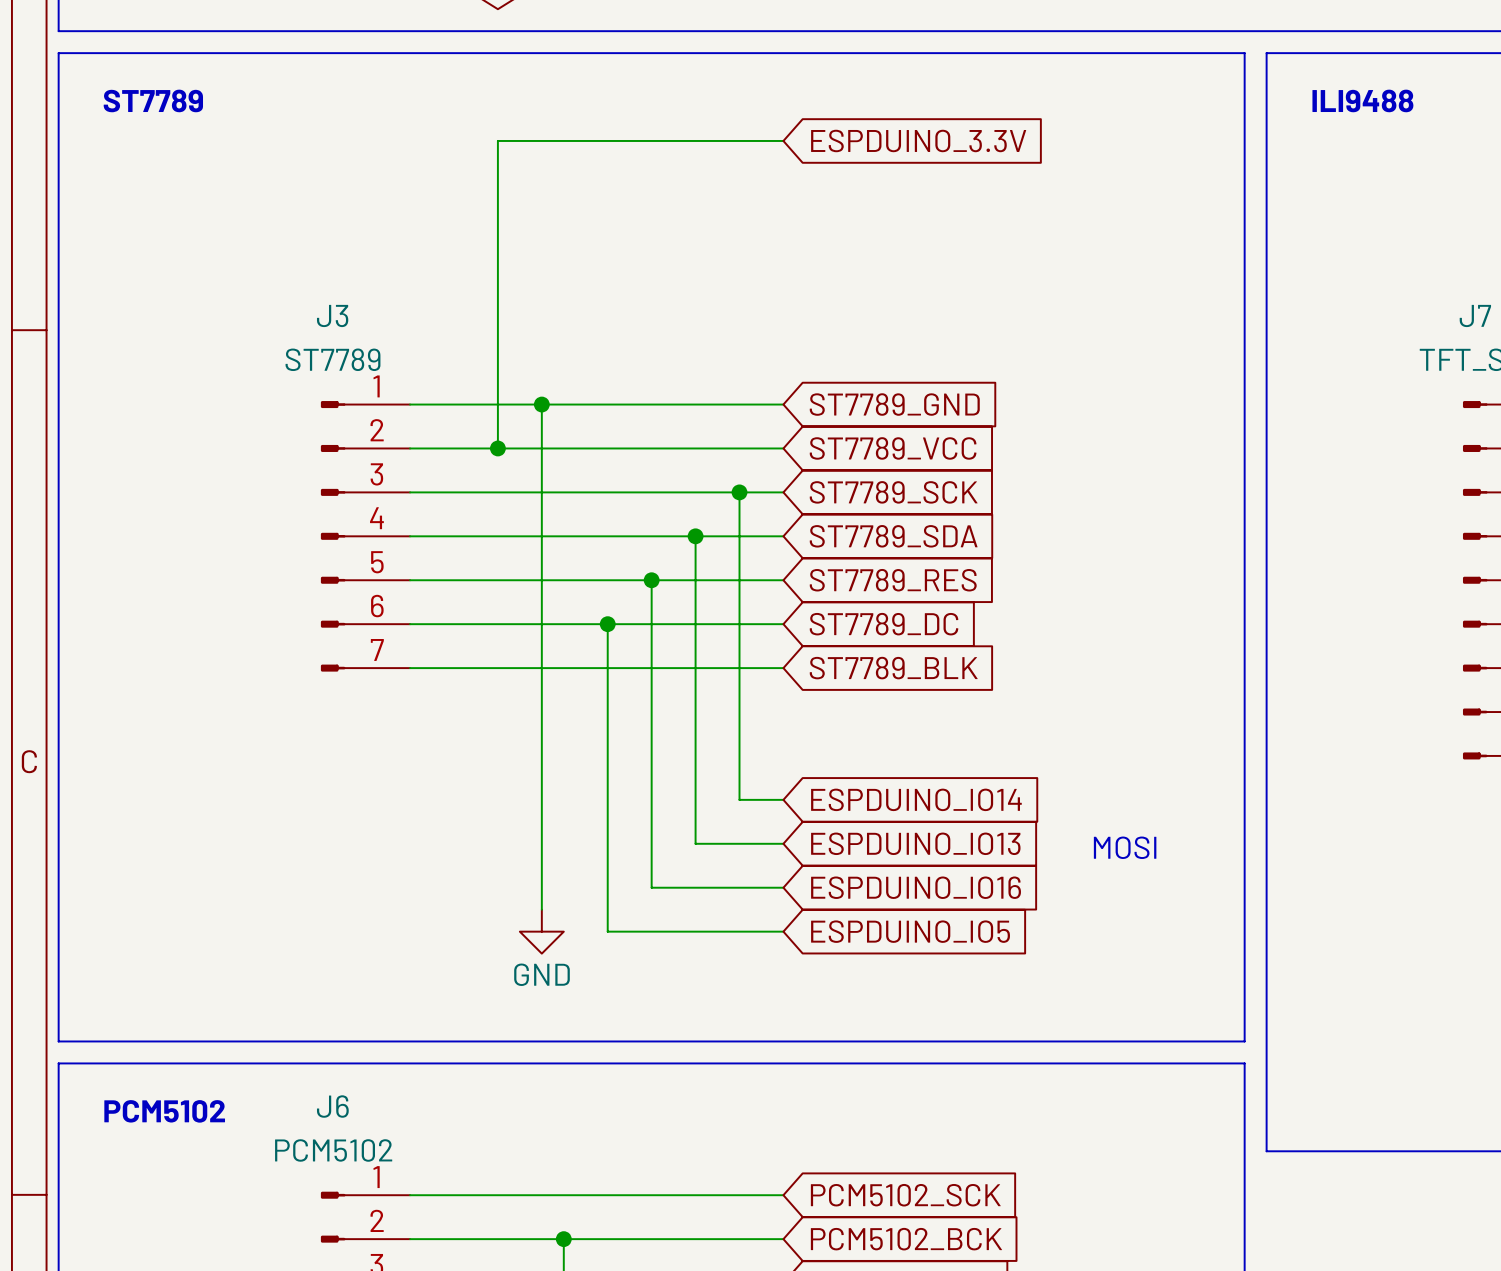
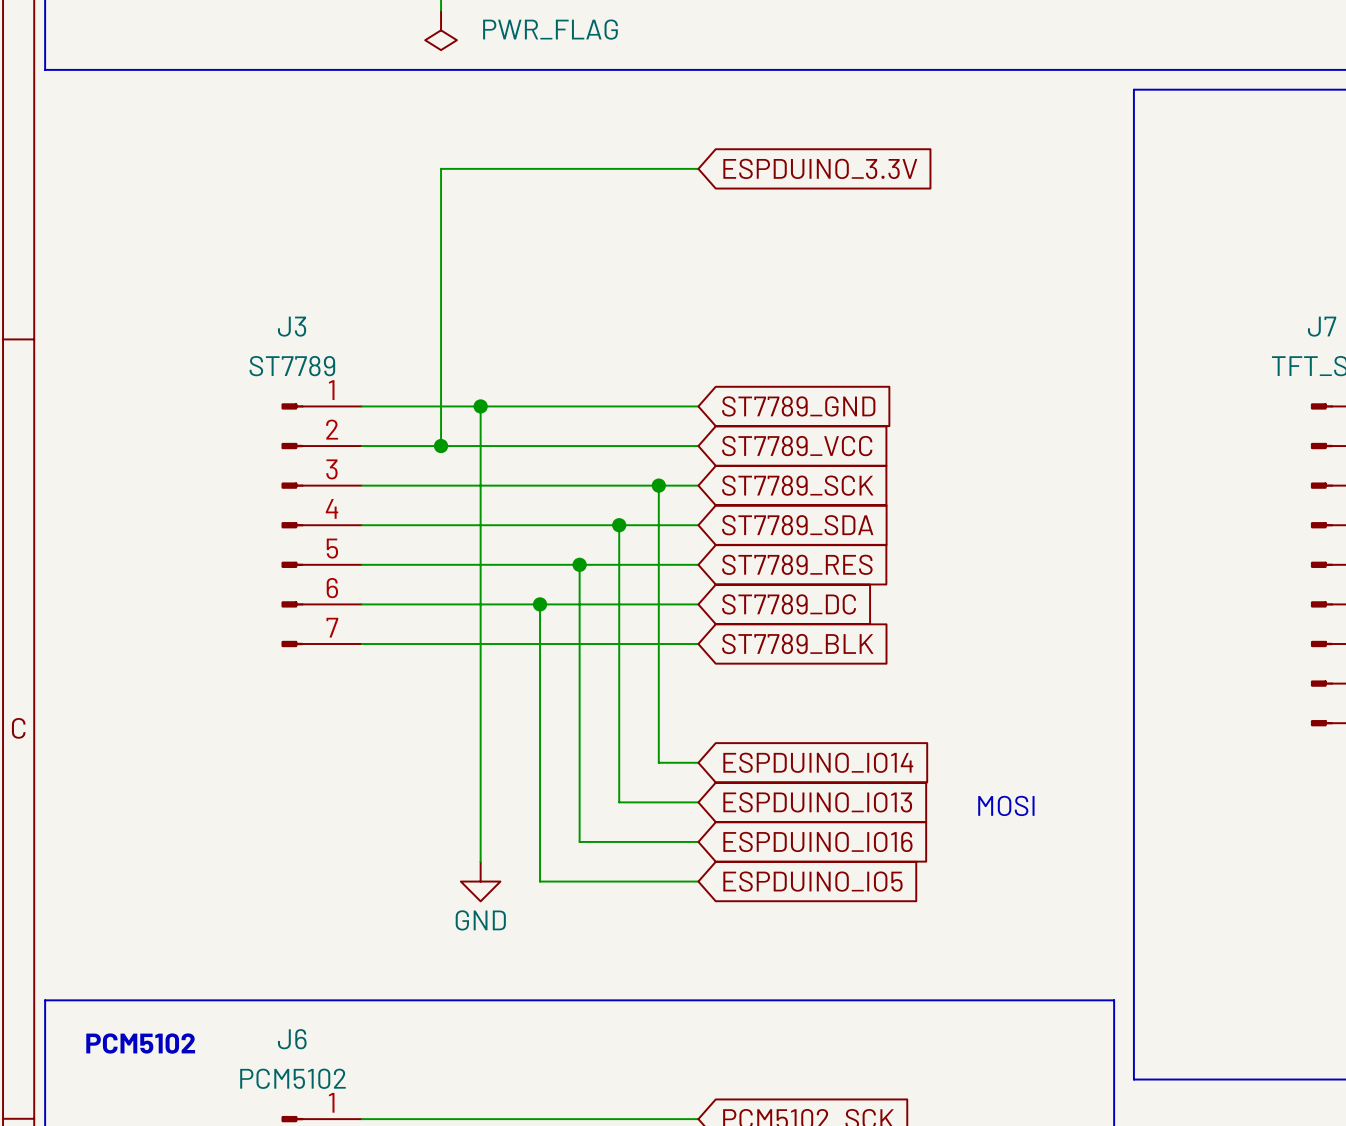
line: (58, 53) (58, 1041) (1244, 1041) (1244, 53) (58, 53) -> none
text: ST7789 (153, 100) -> none
text: ILI9488 (1362, 100) -> none

